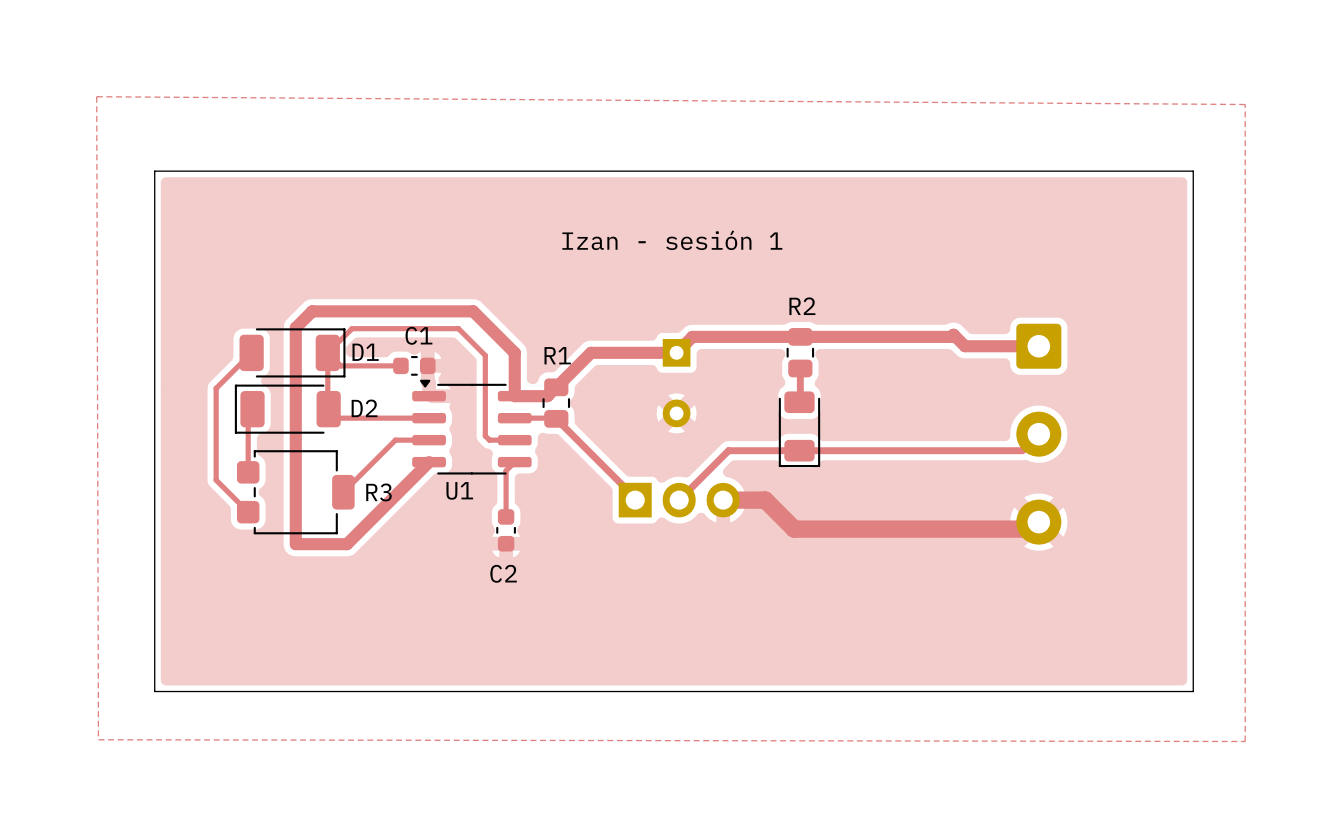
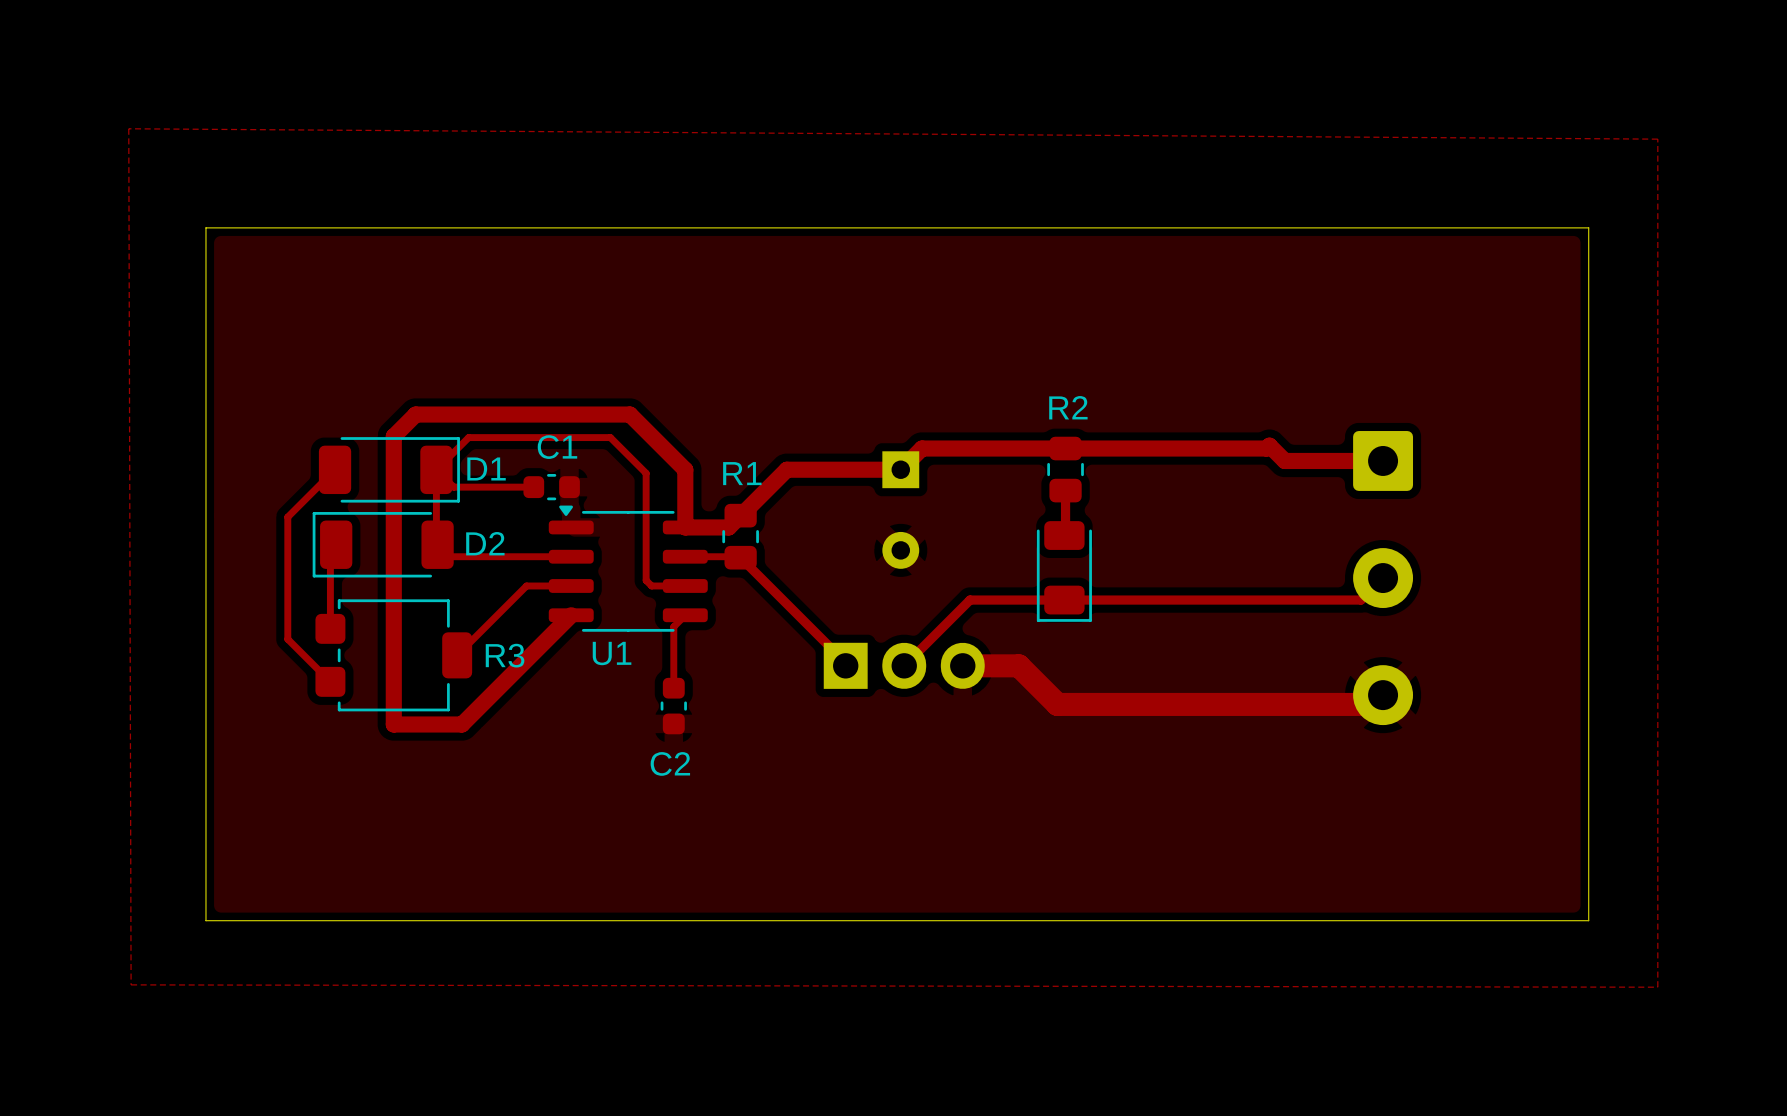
text: Izan - sesión 1 (672, 240) -> none

